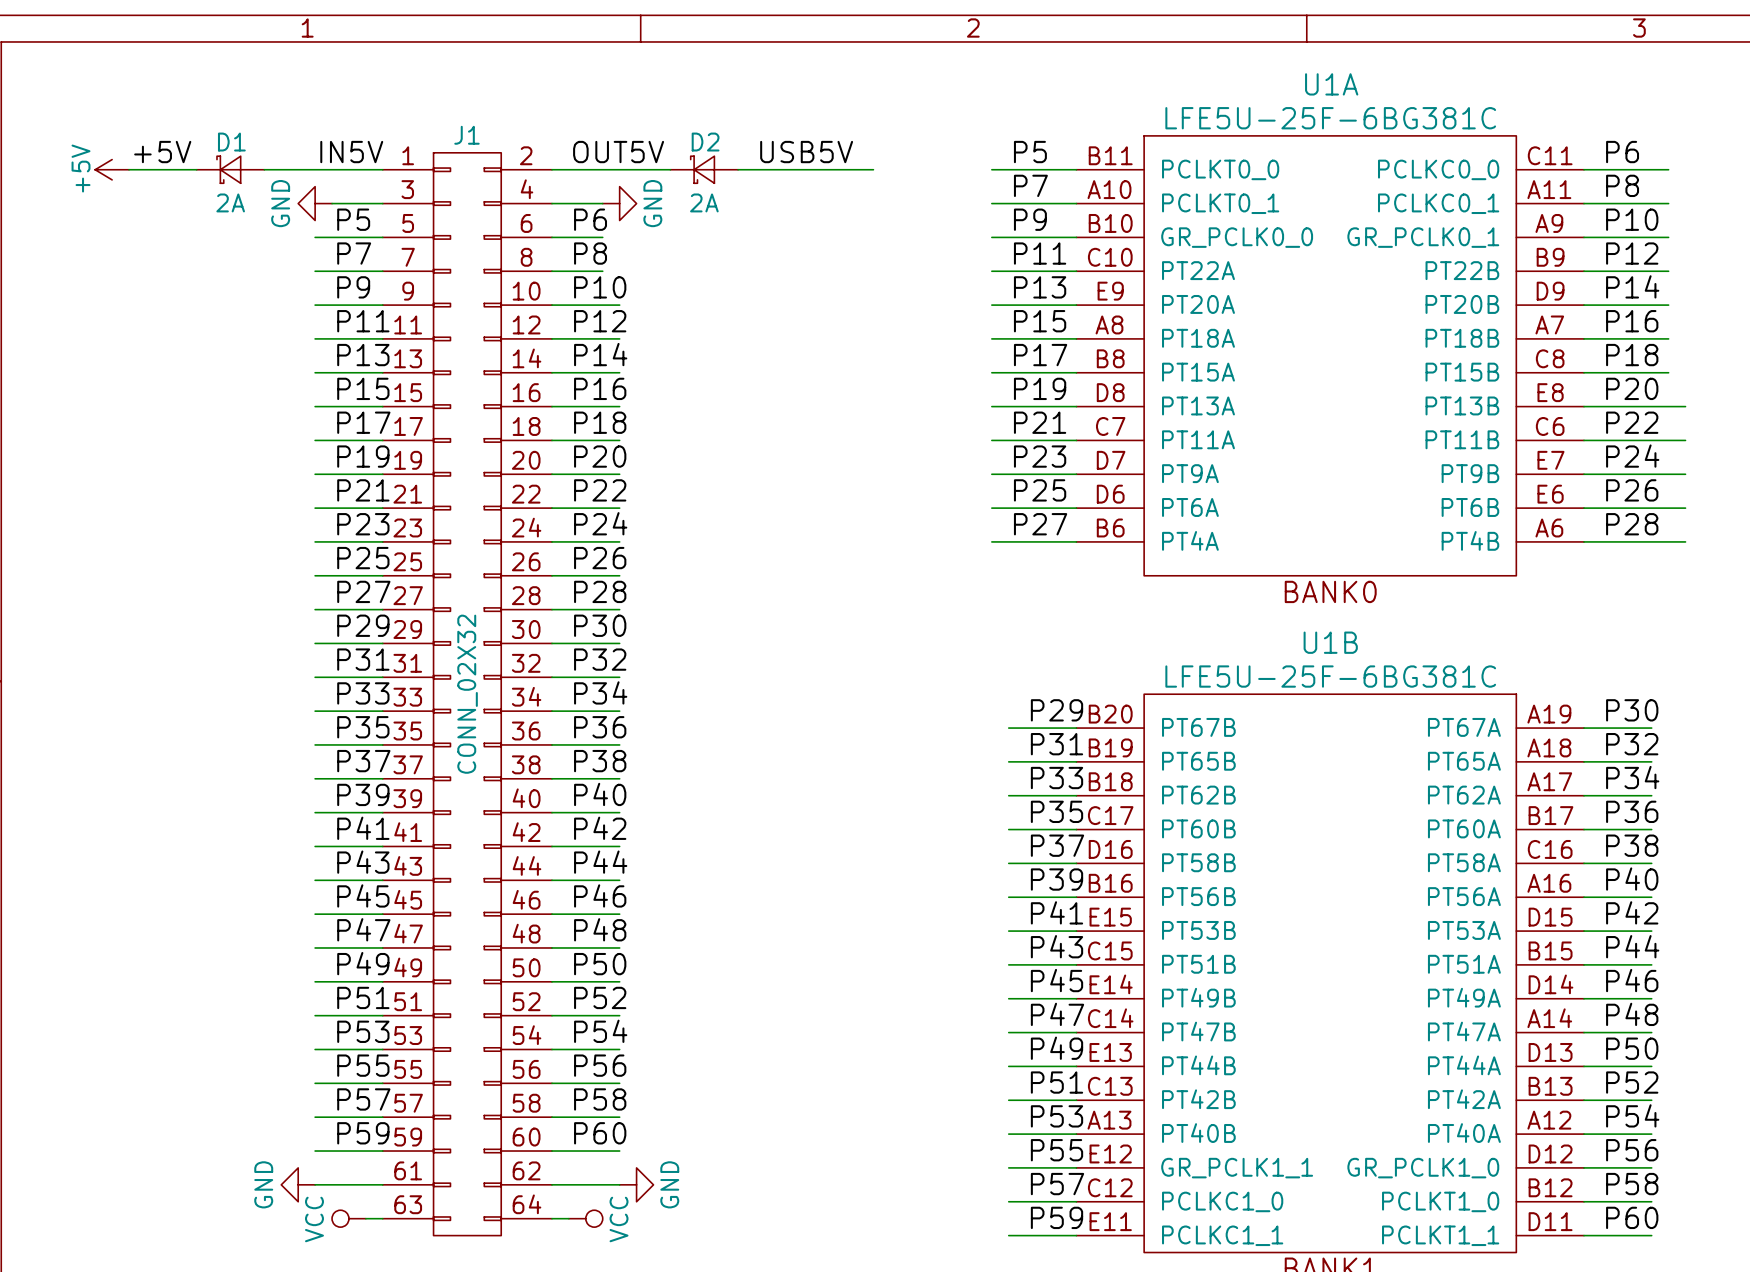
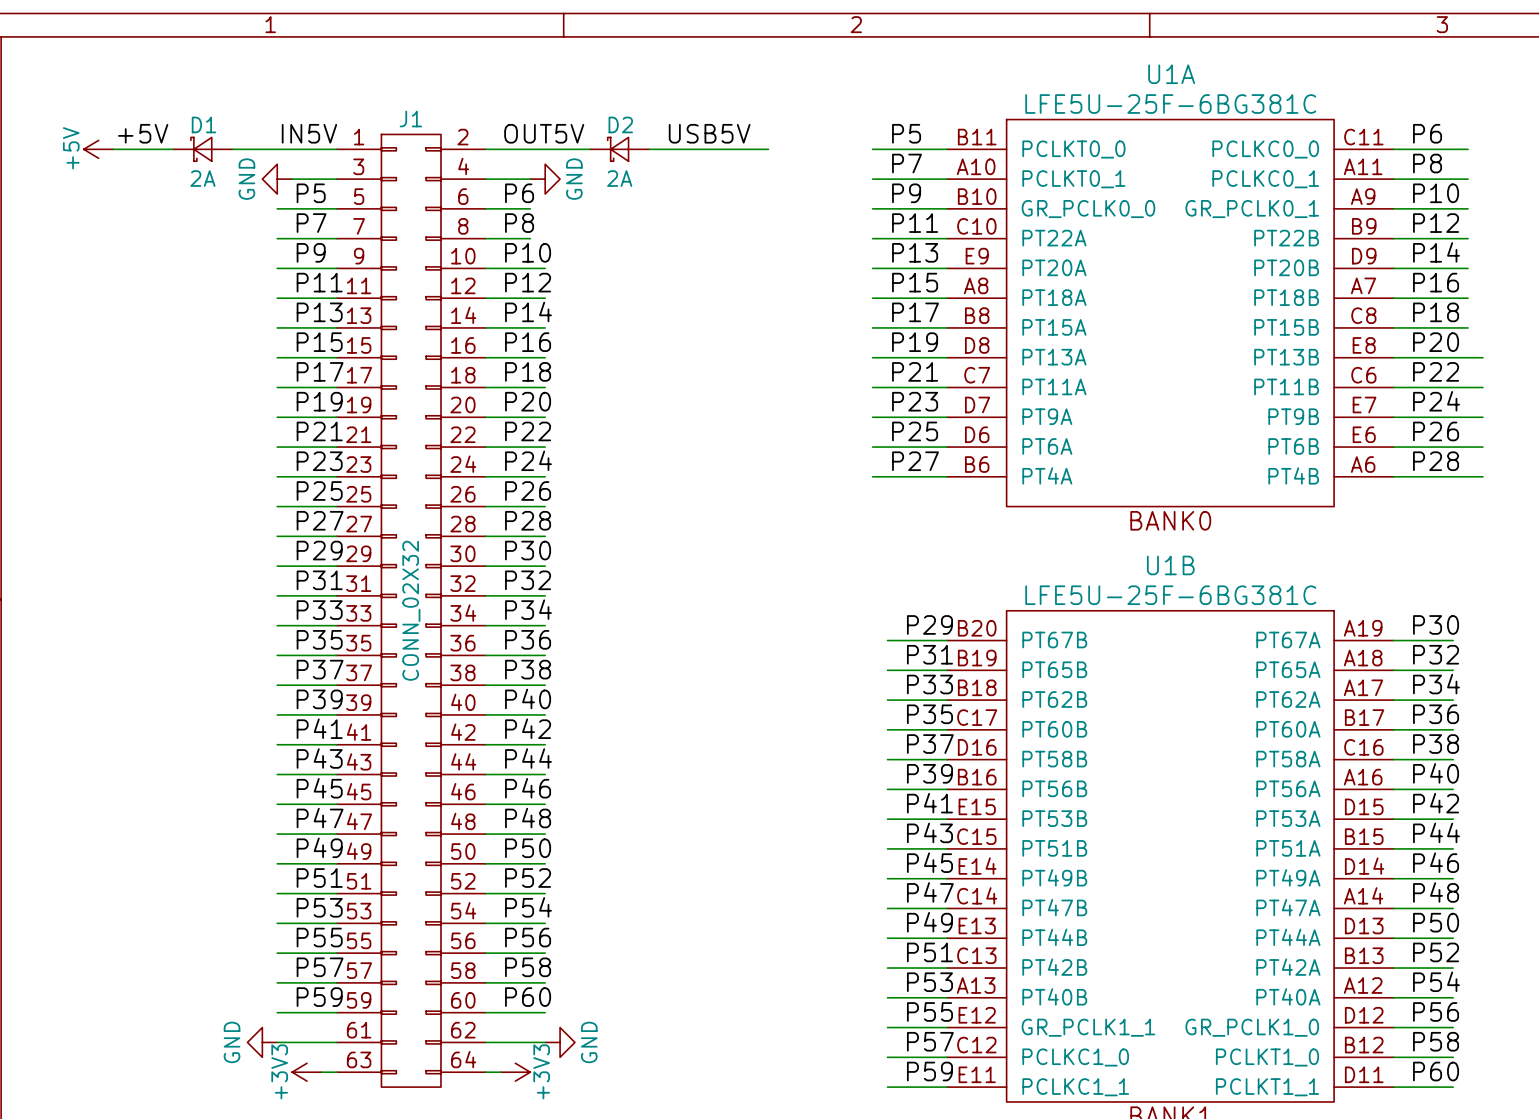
power symbol: VCC (348, 1218) -> +3V3 (307, 1072)
power symbol: VCC (585, 1218) -> +3V3 (515, 1072)

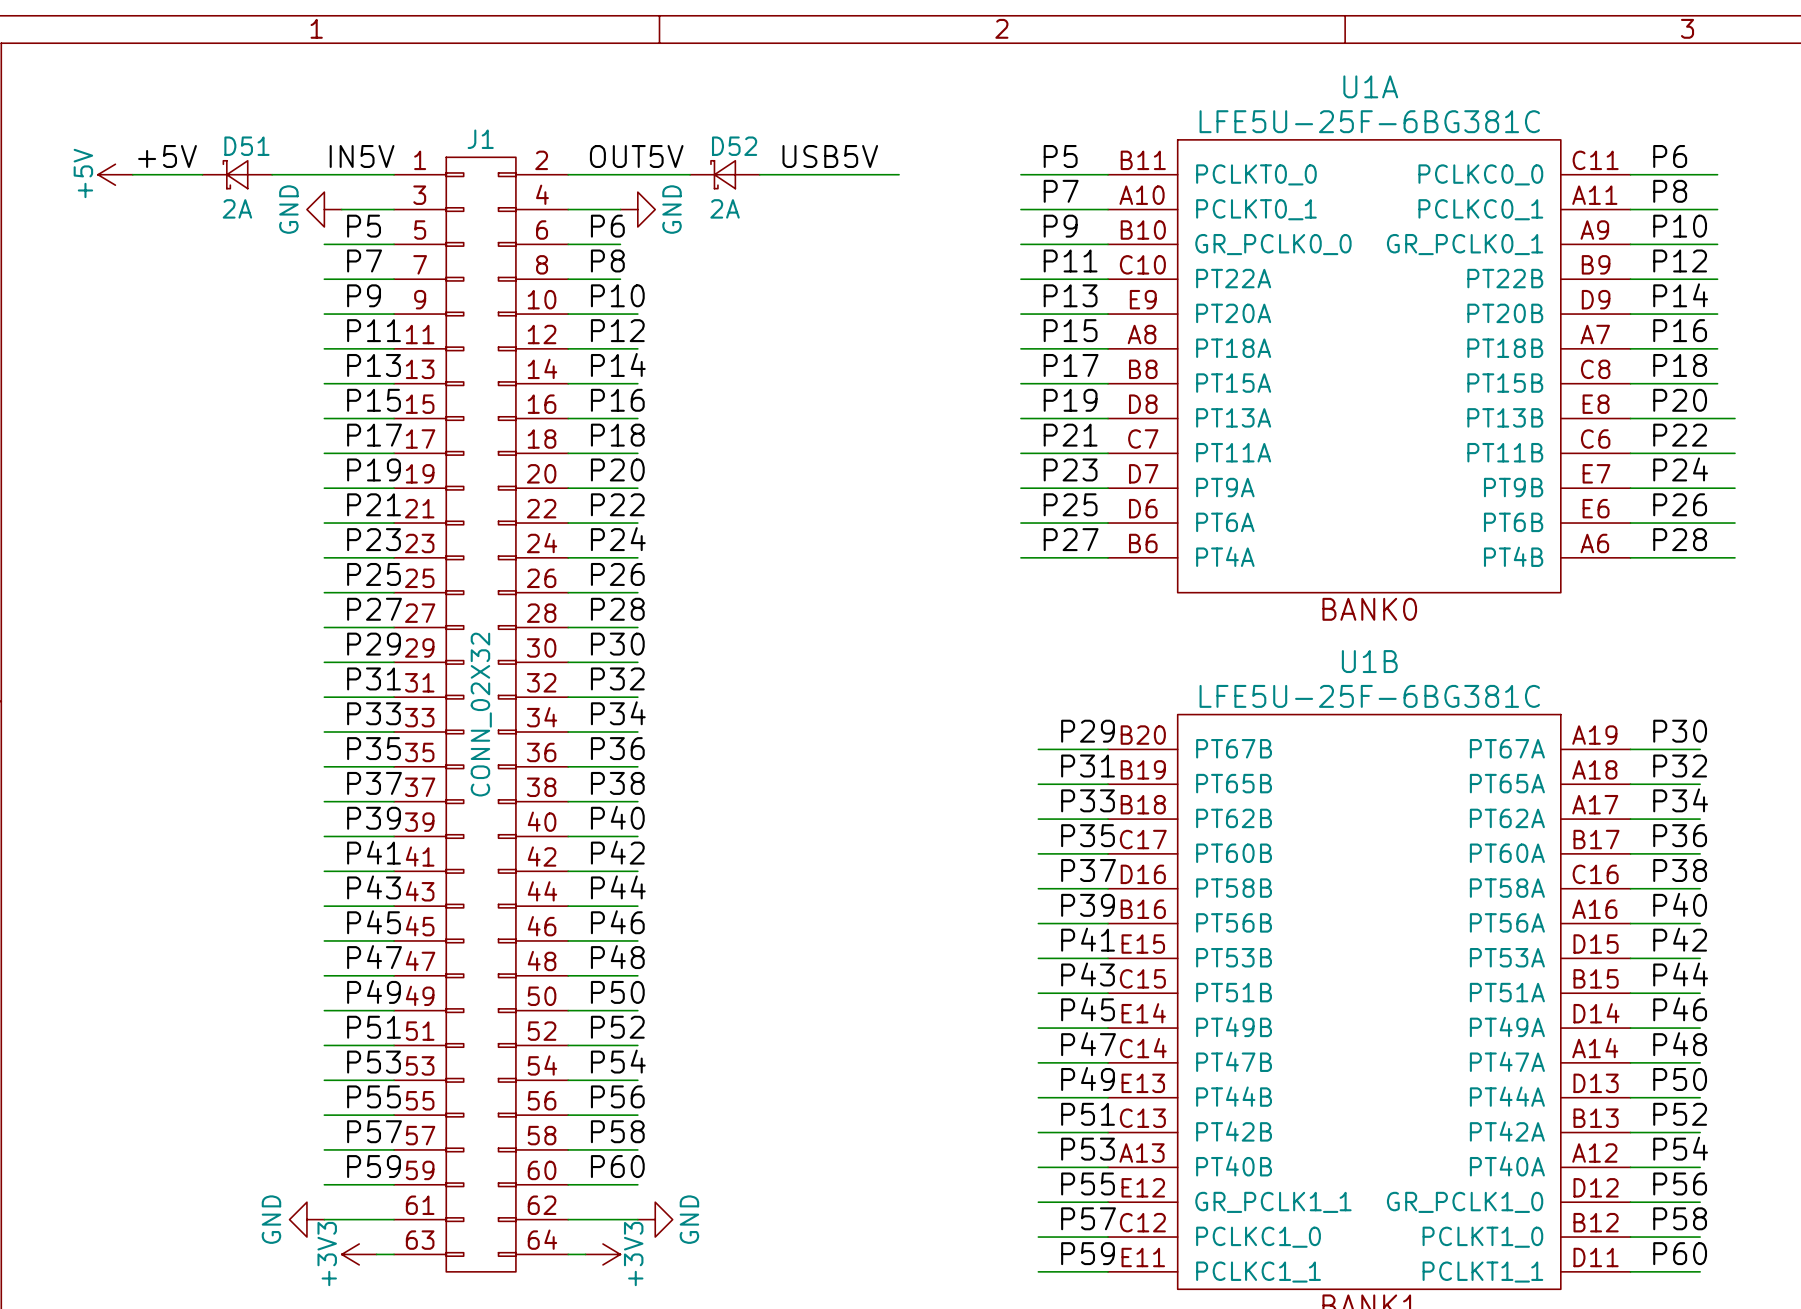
D1 name: D1 (203, 124) -> D51 (246, 146)
D2 name: D2 (620, 124) -> D52 (734, 146)

